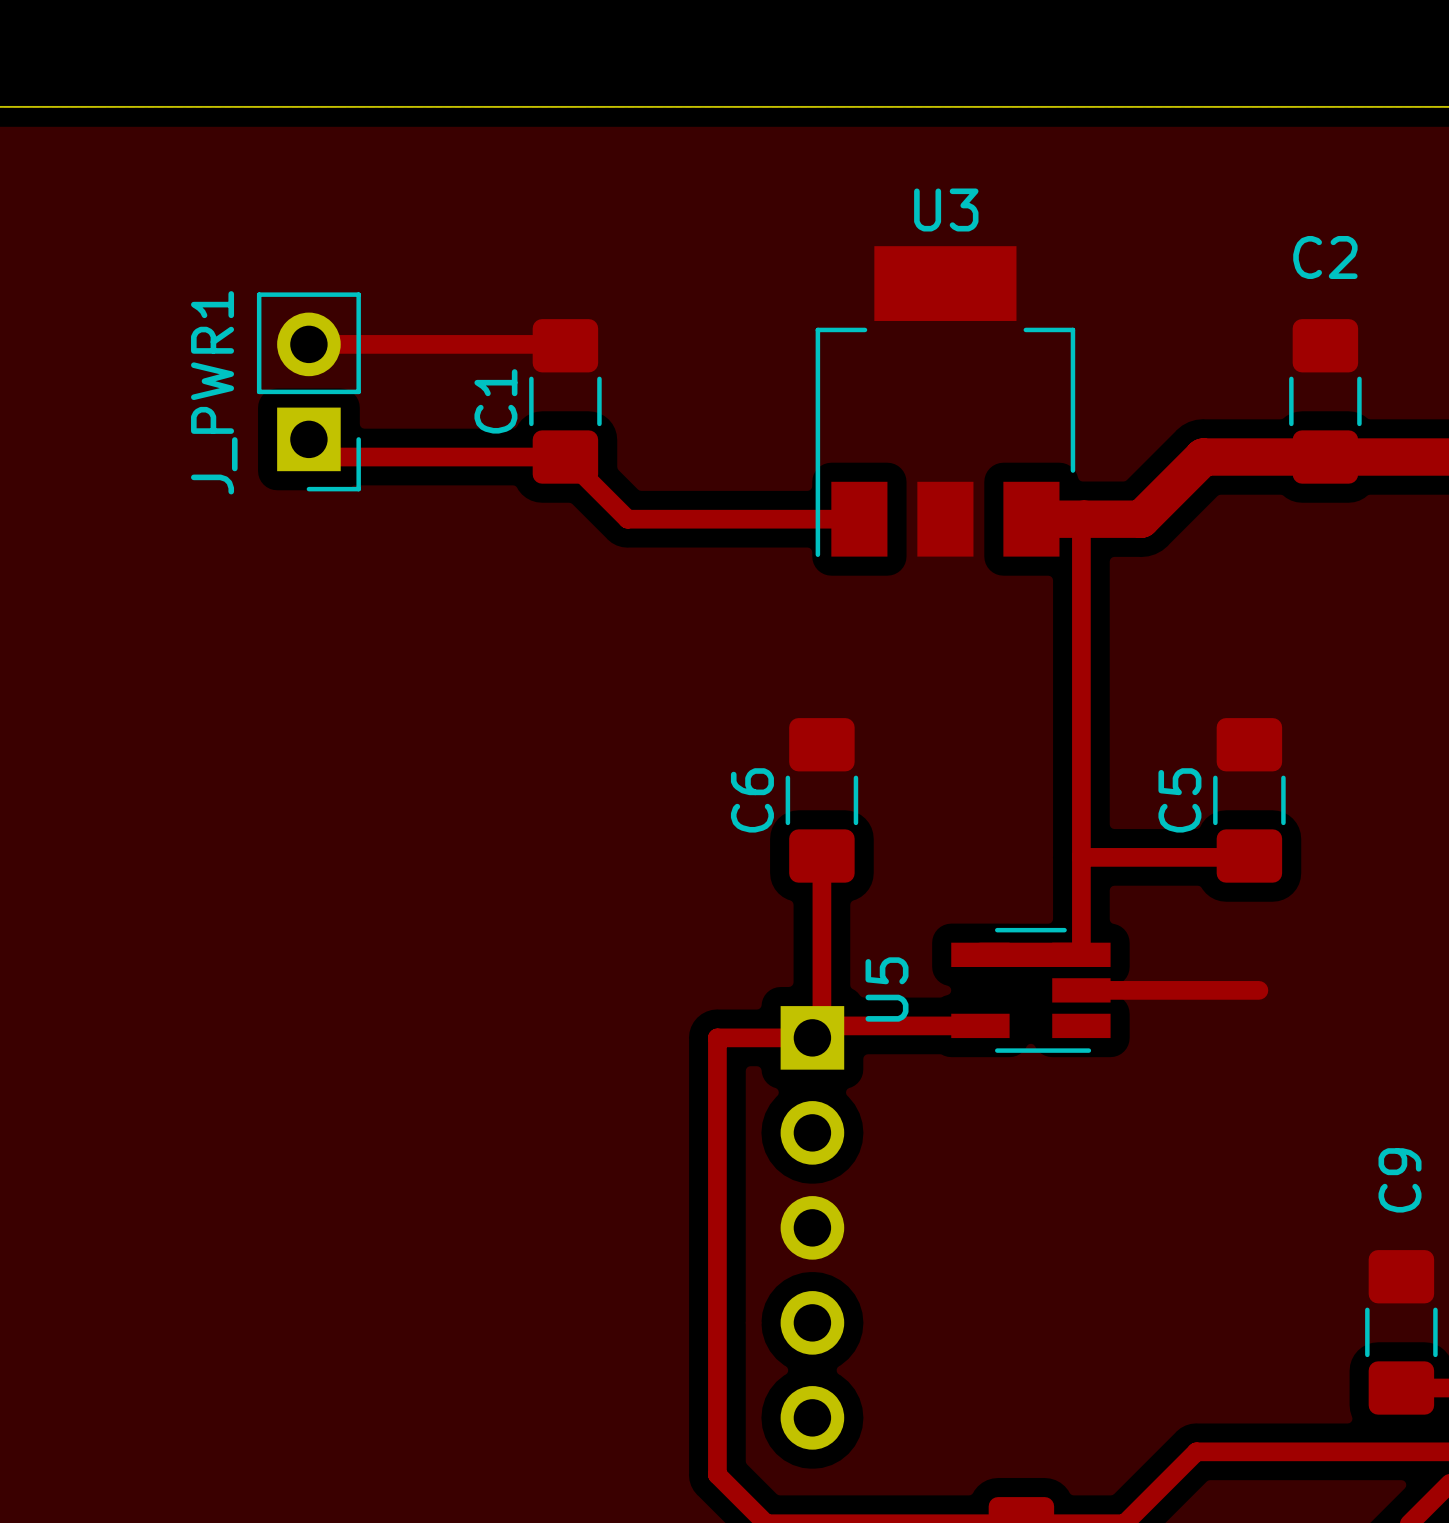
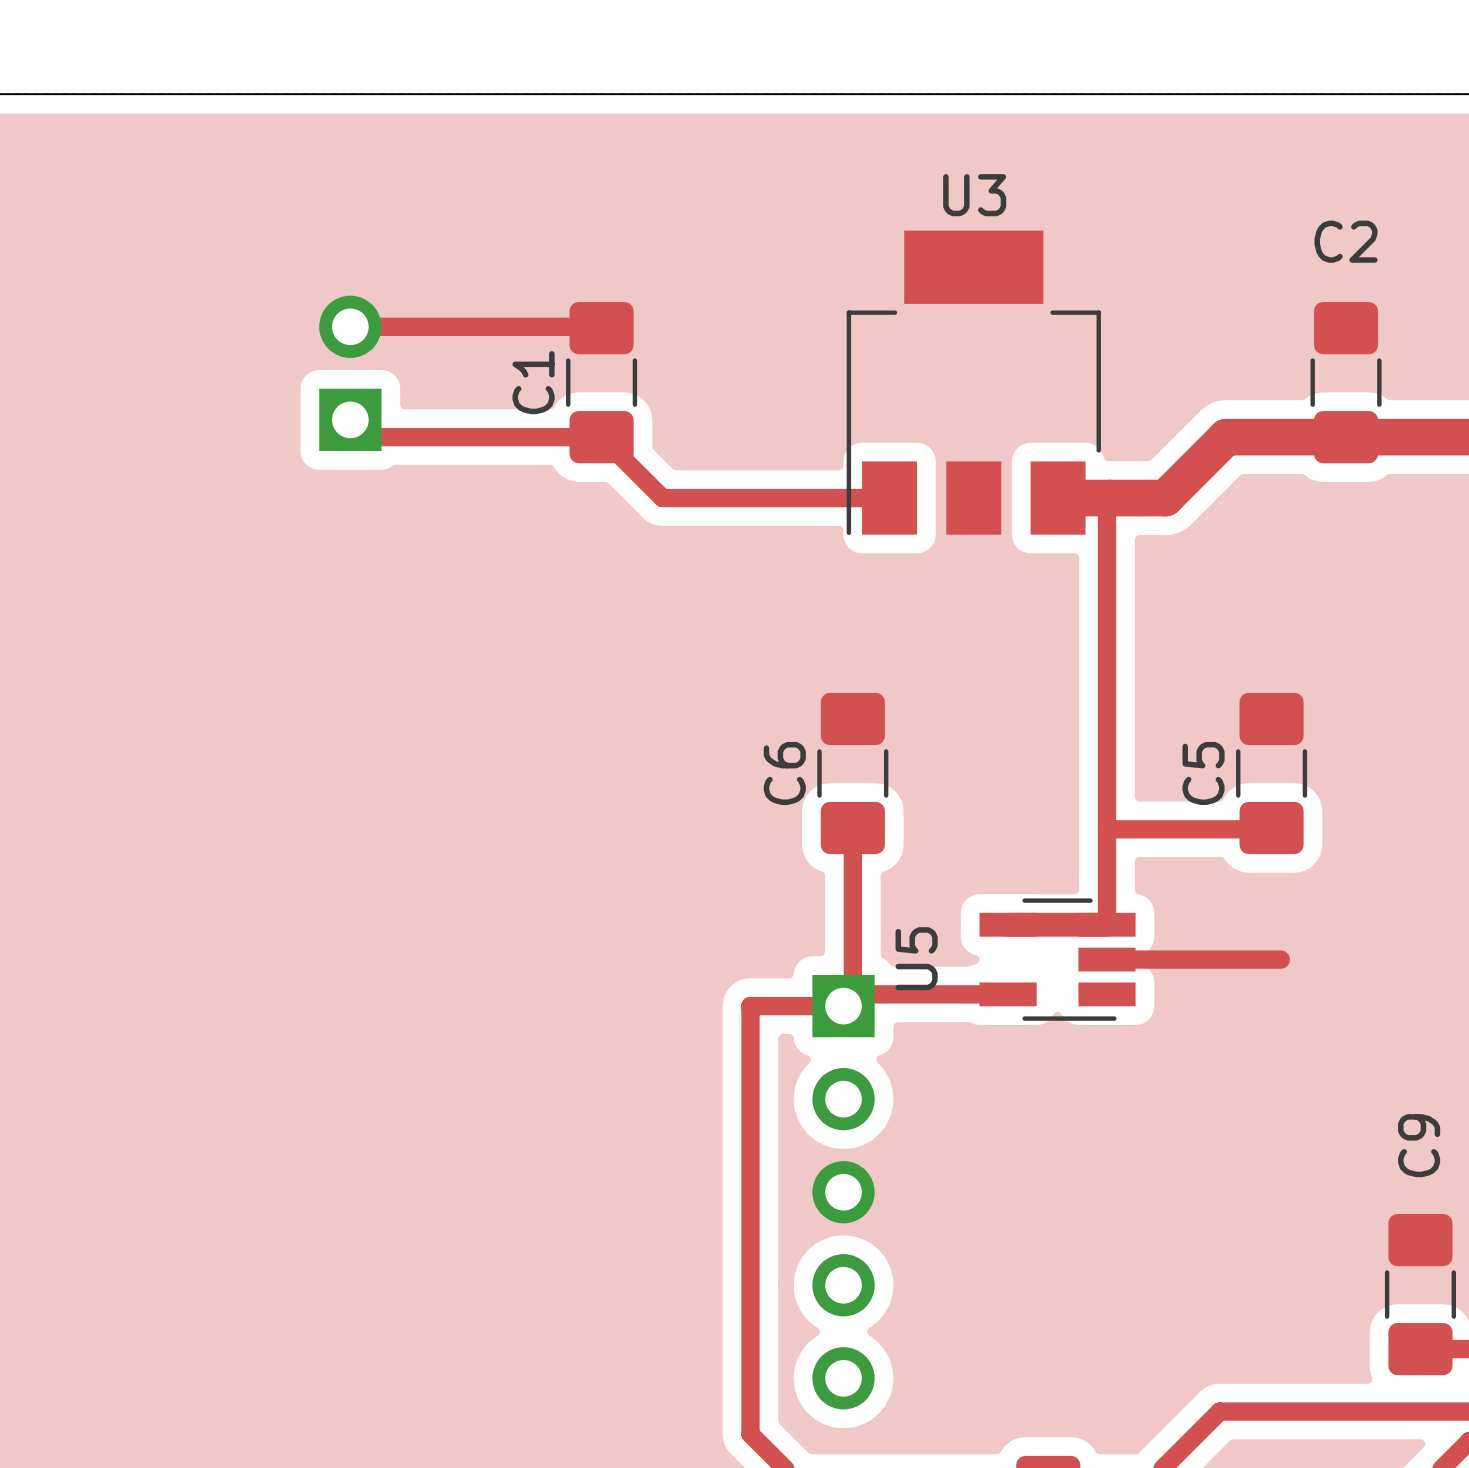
J_PWR1 side: top (308, 391) -> bottom (350, 373)

